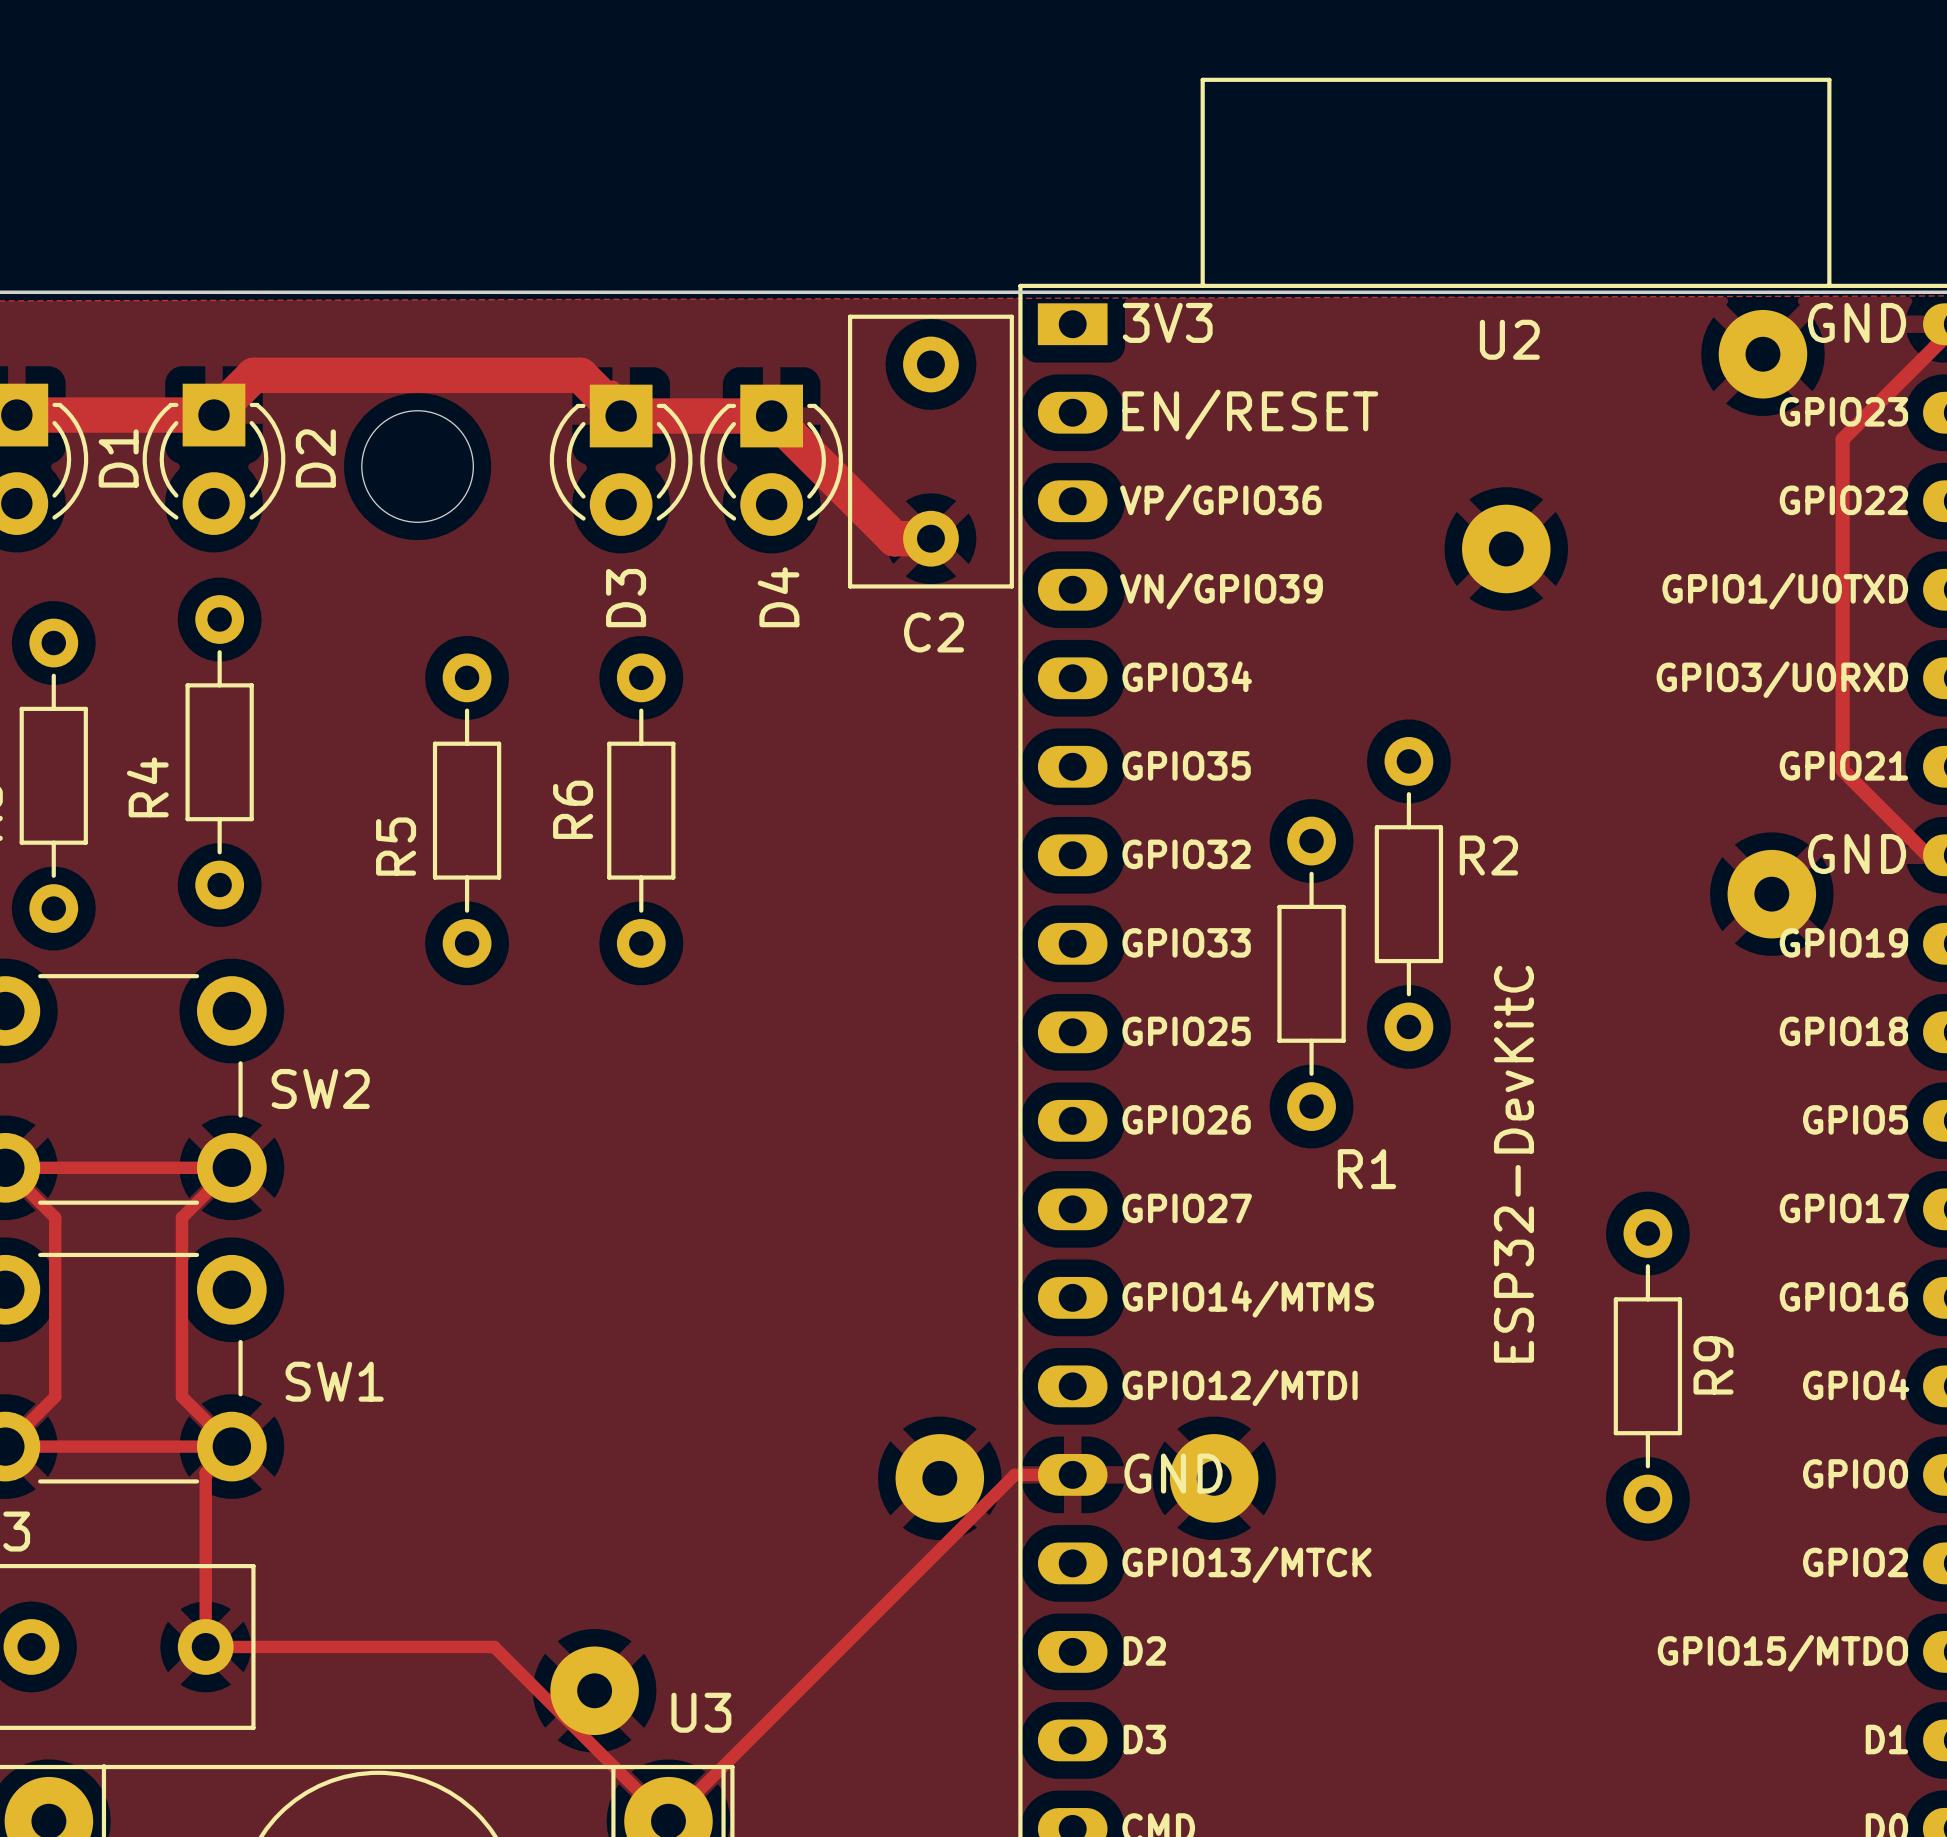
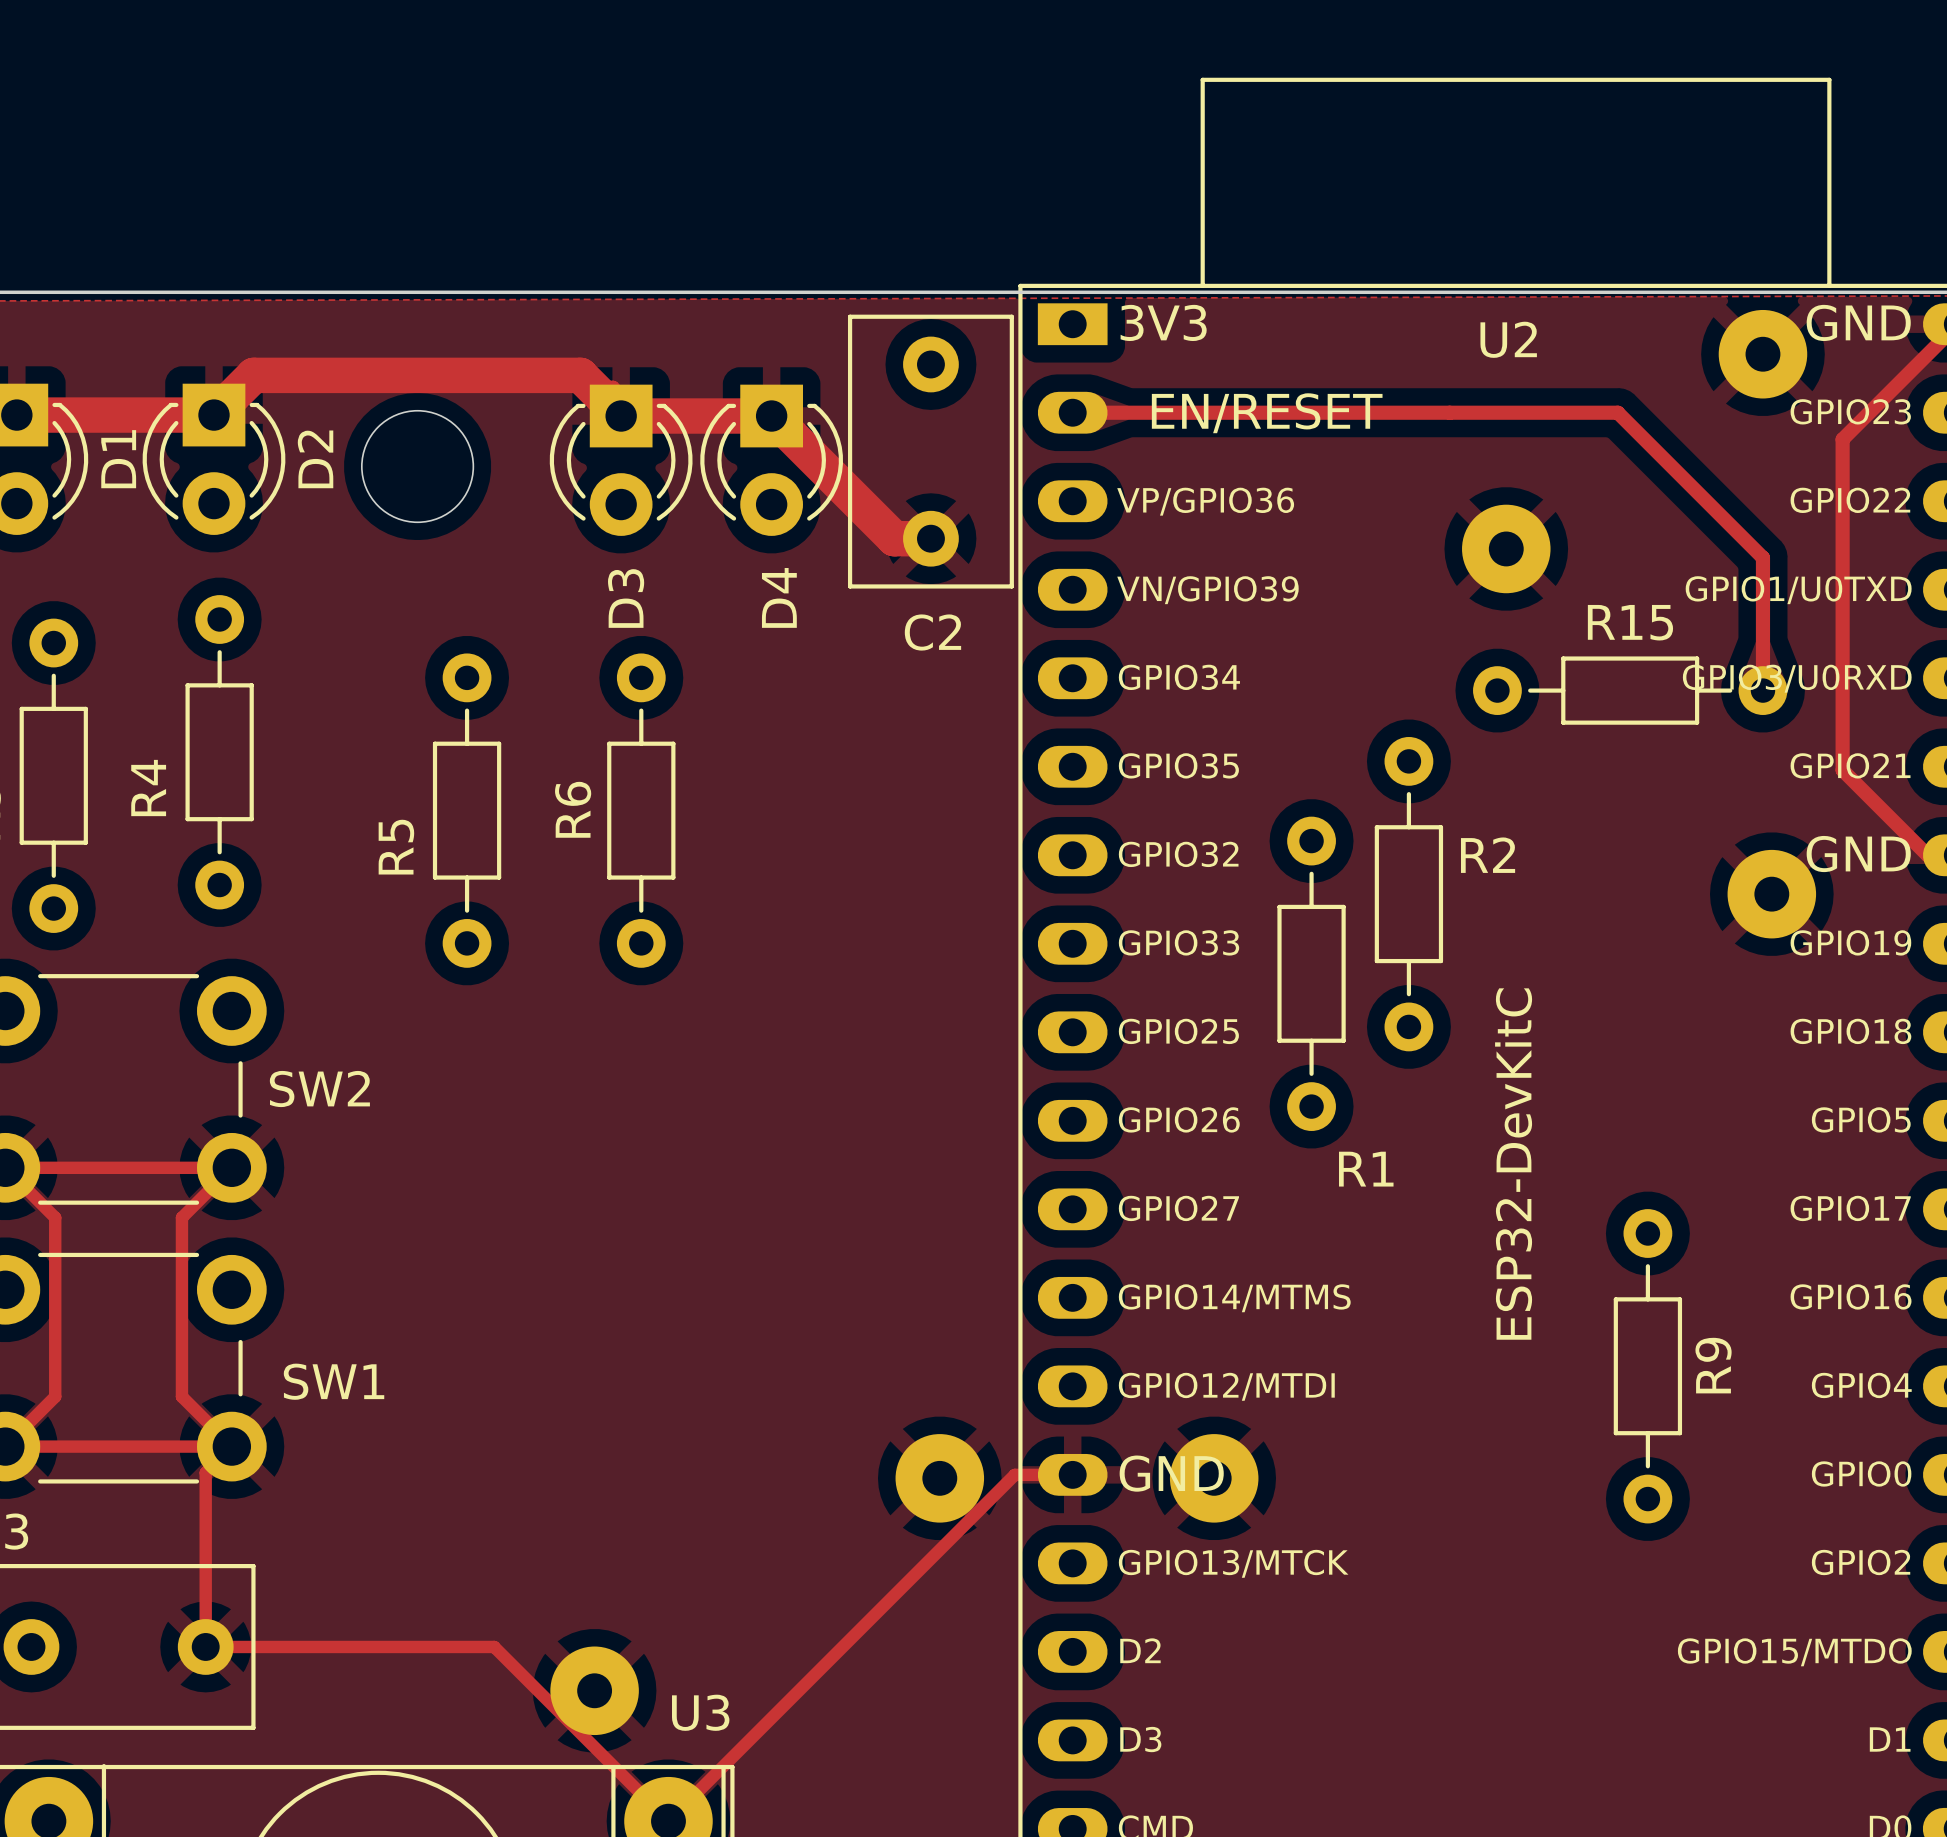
track: none -> (1072, 412) (1617, 412) (1762, 557) (1762, 690)
R15: none -> (1630, 690)

